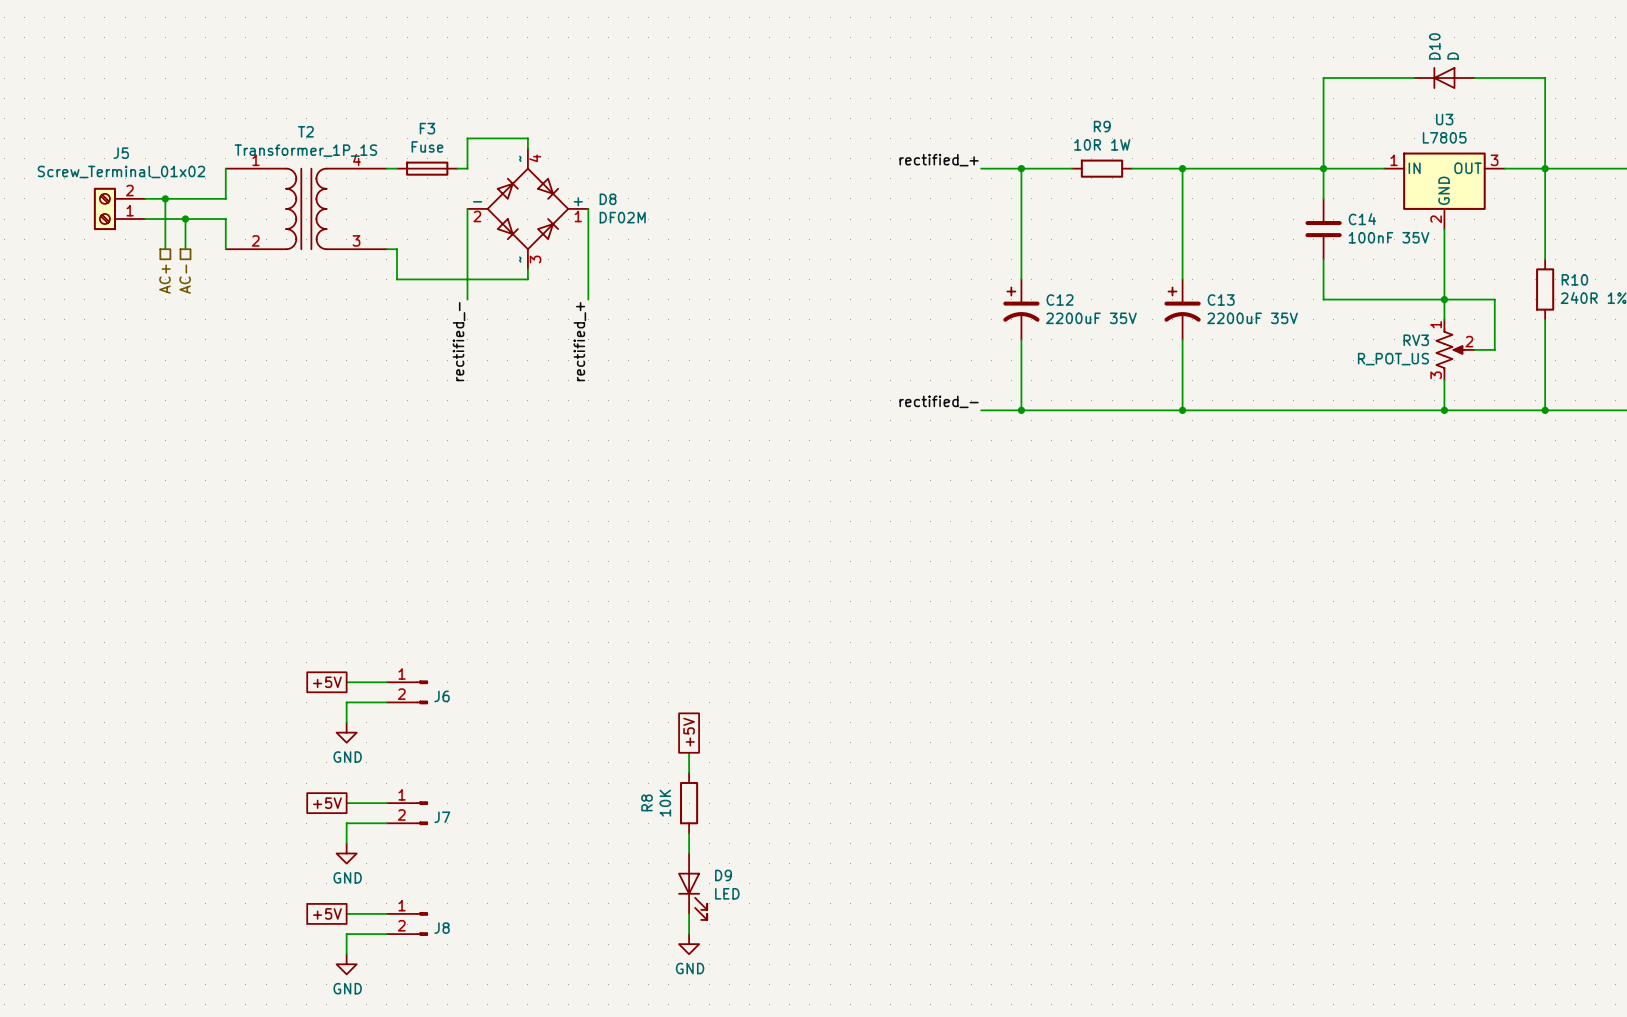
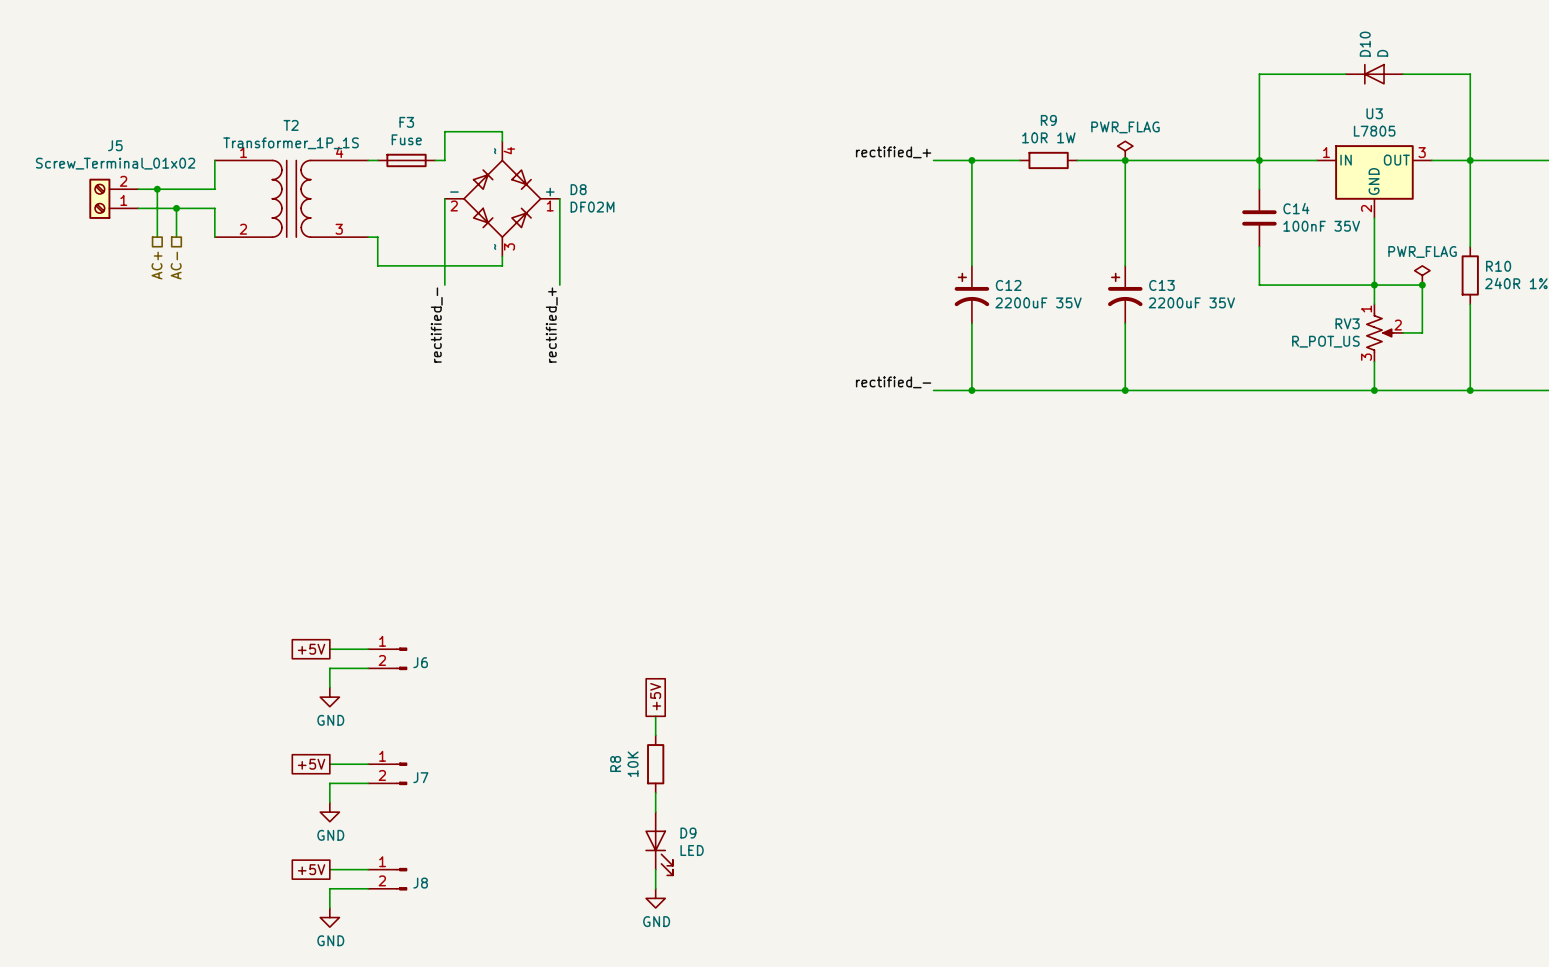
power symbol: none -> PWR_FLAG (1125, 150)
power symbol: none -> PWR_FLAG (1422, 275)
junction: none -> (1422, 285)

